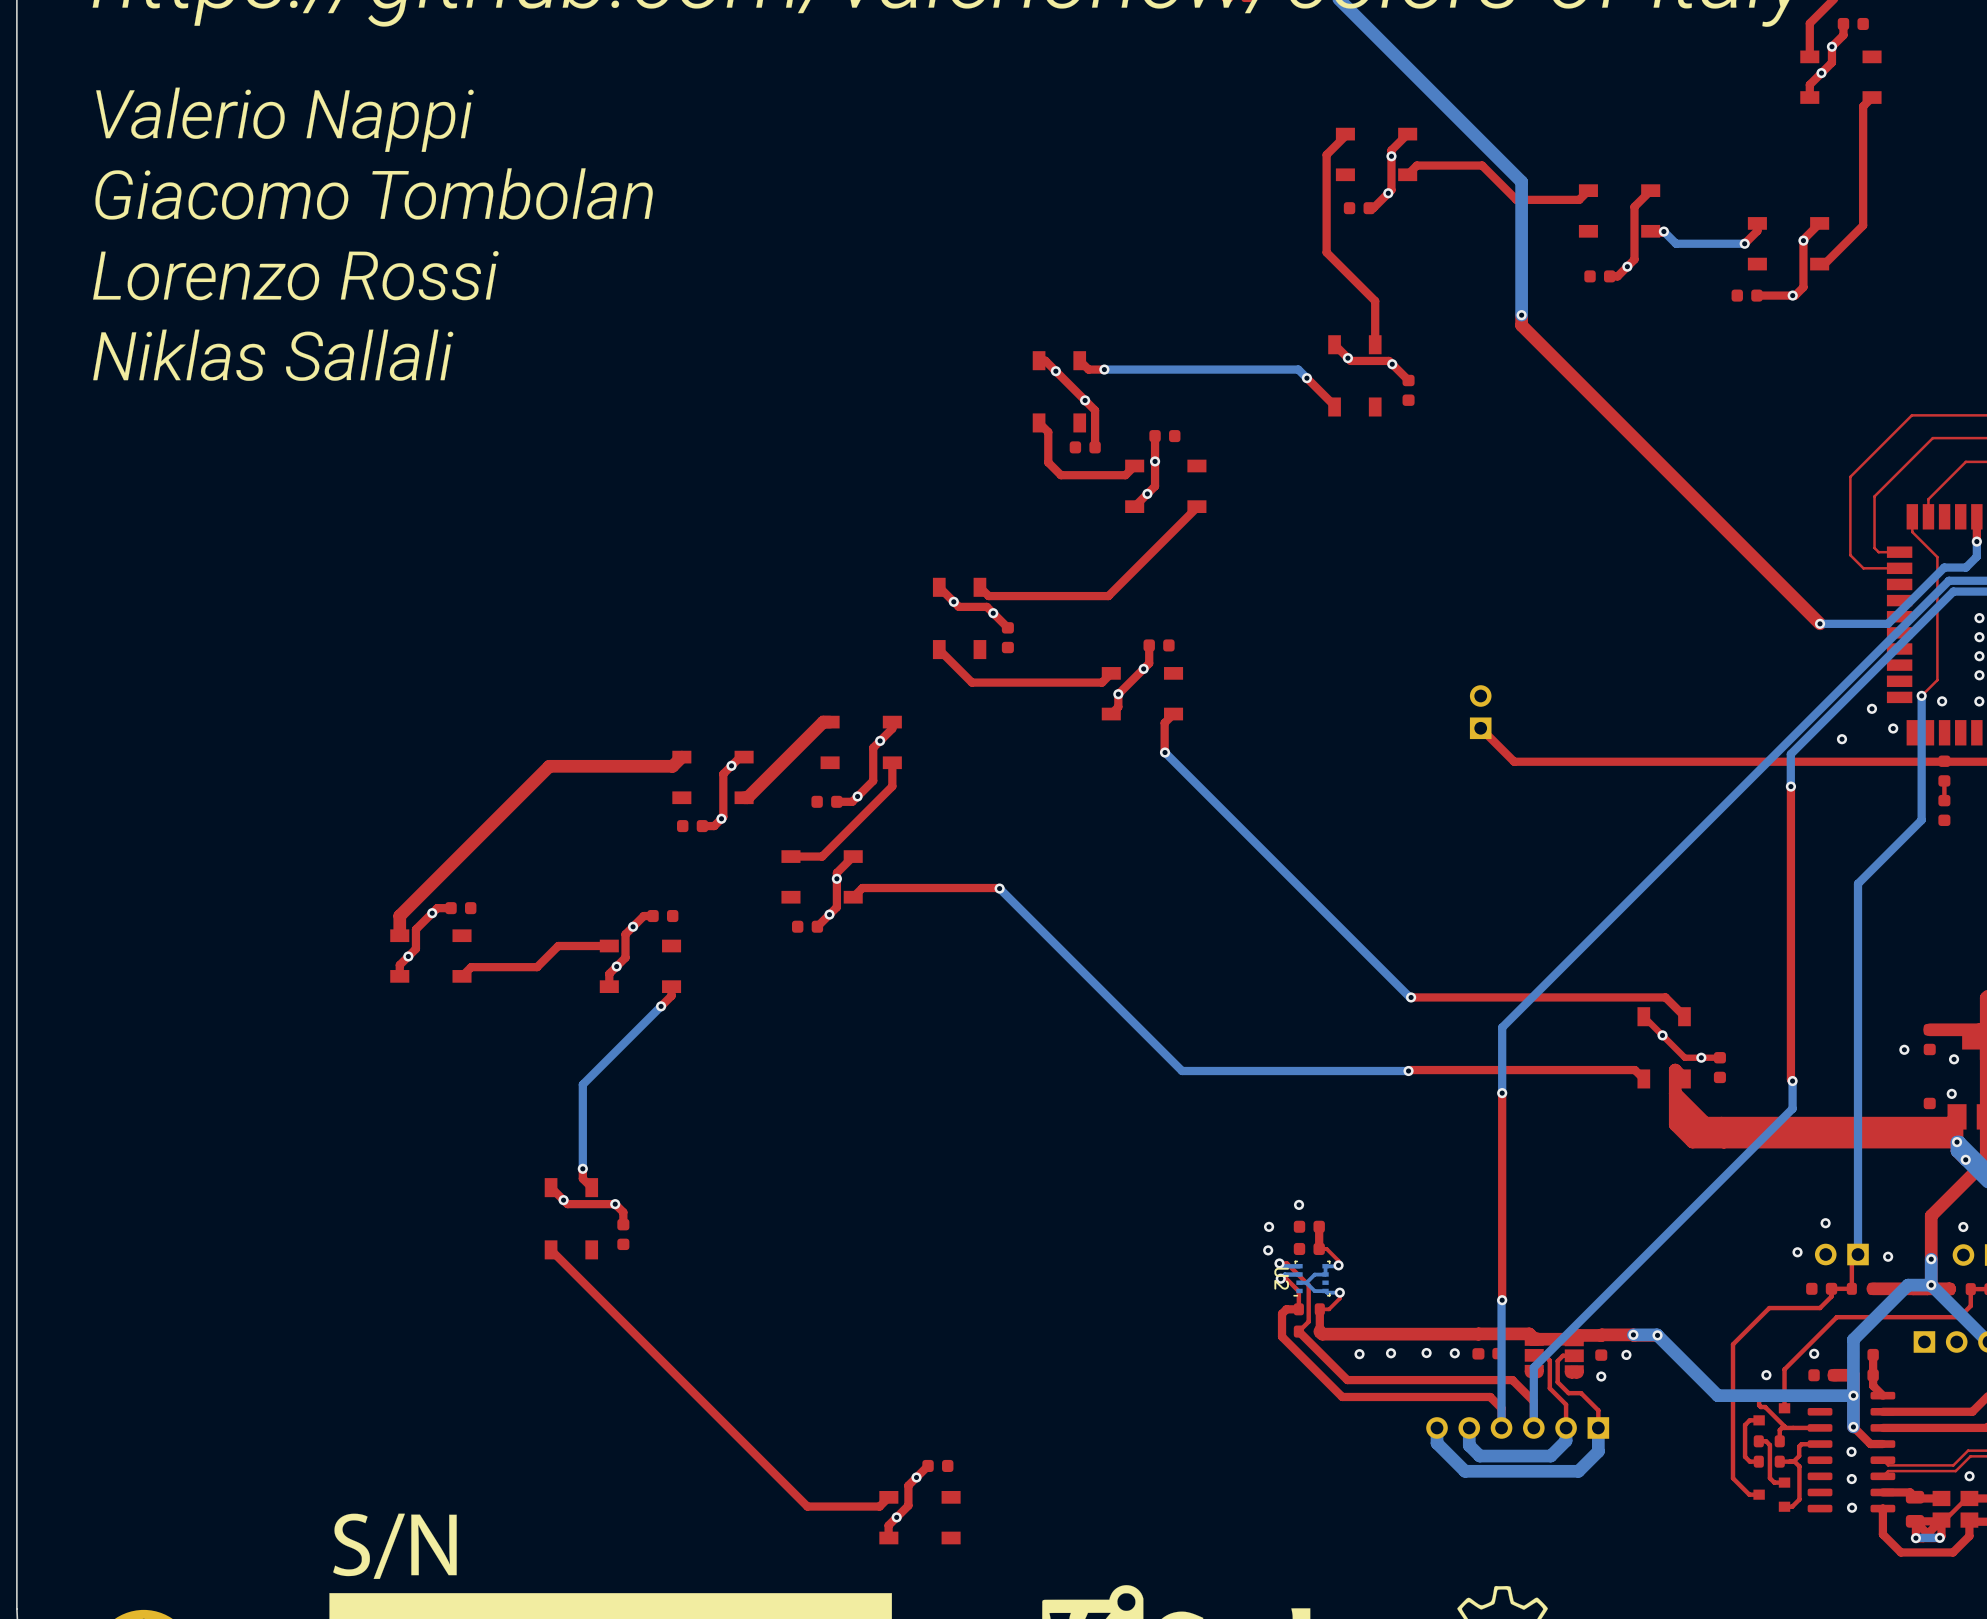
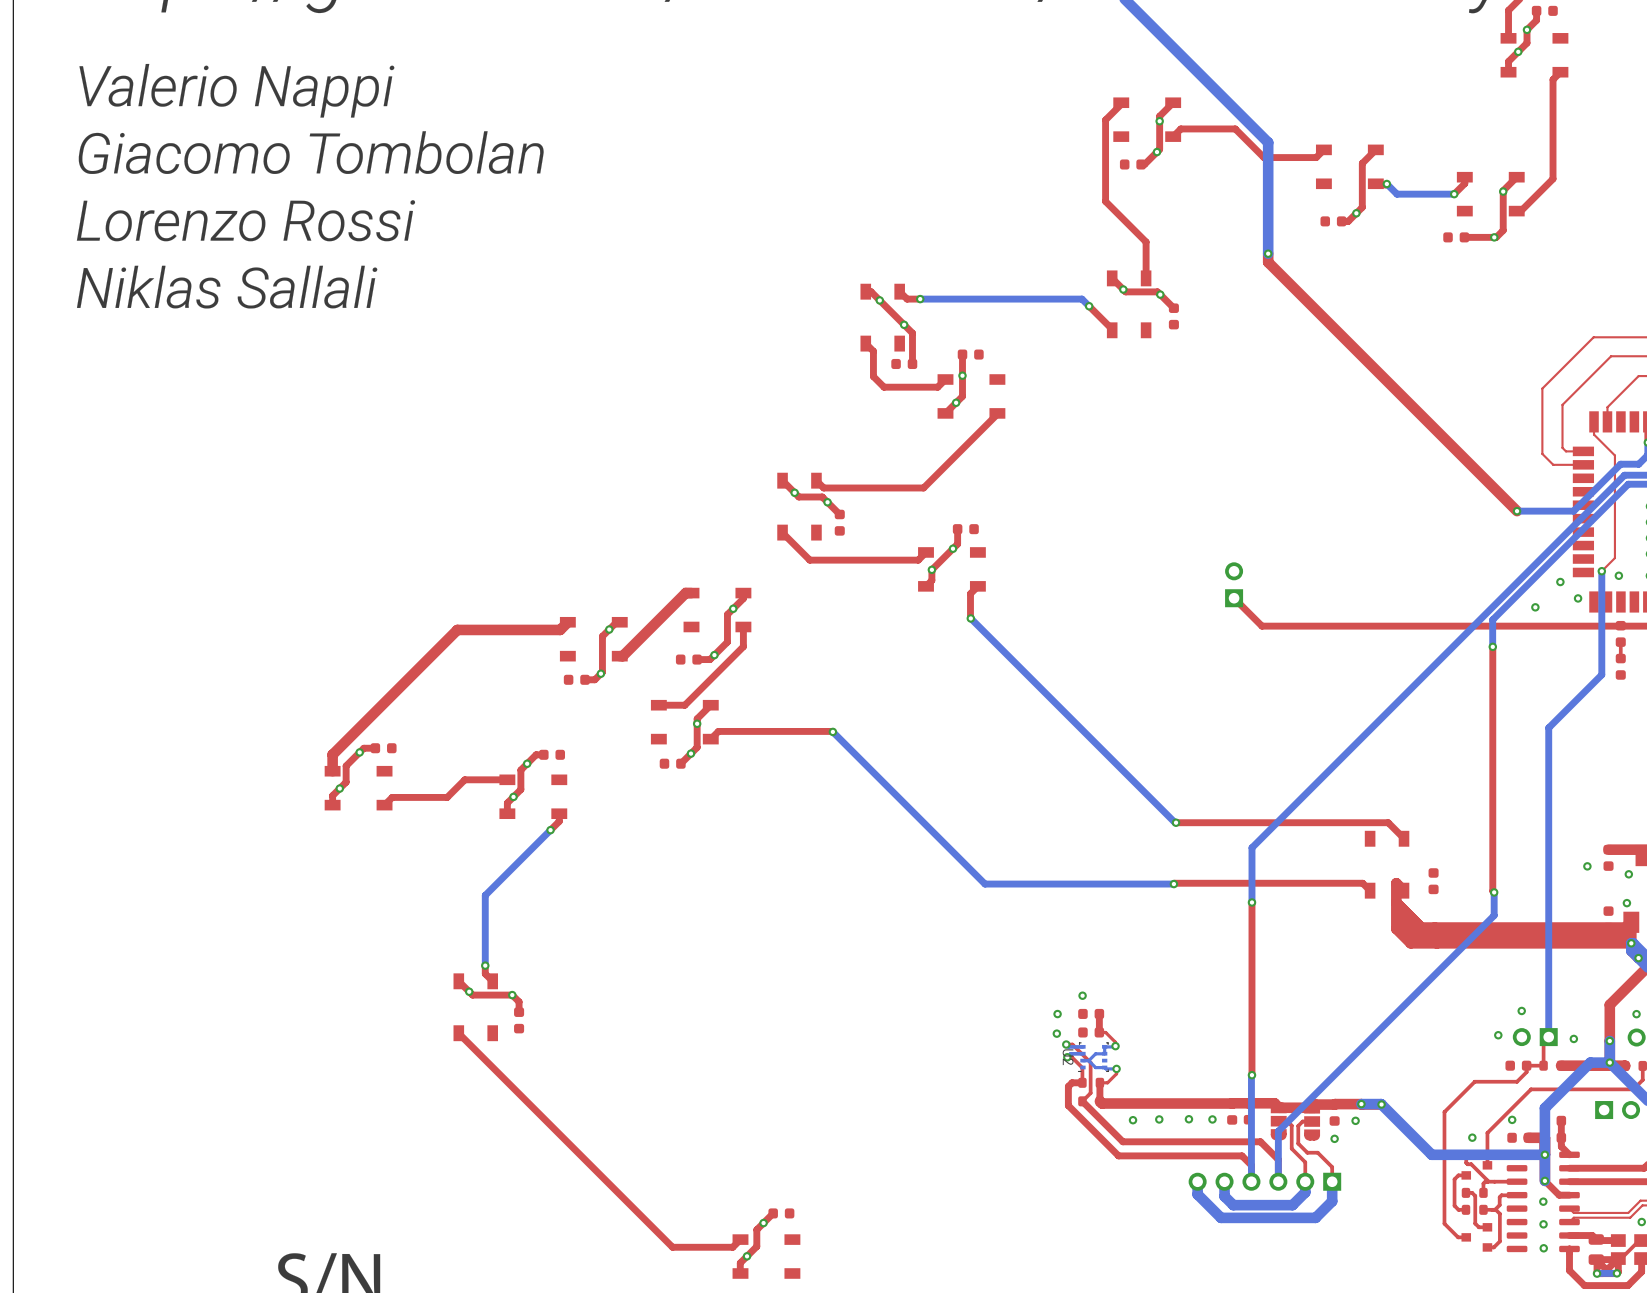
top track: (1643, 1016) (1684, 1057) (1719, 1057) -> none
via: (1662, 1035) -> none
via: (1701, 1057) -> none

